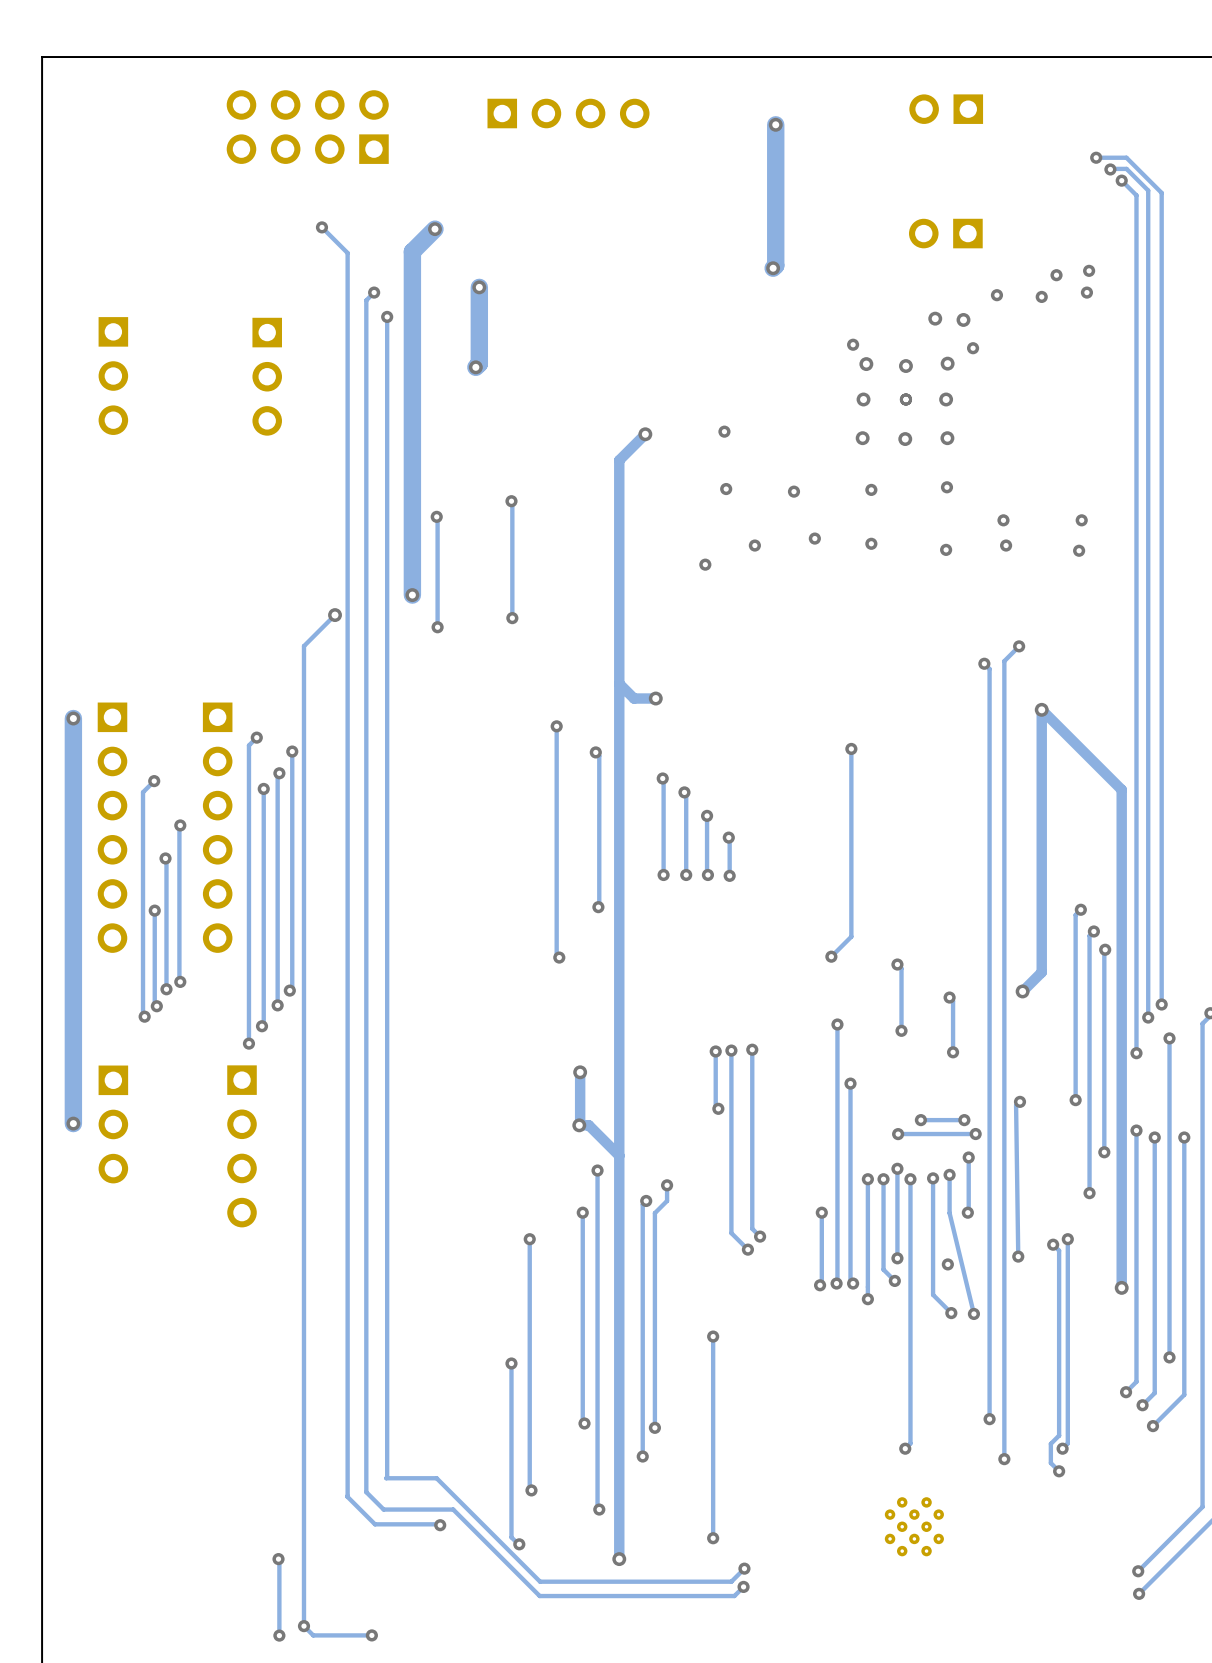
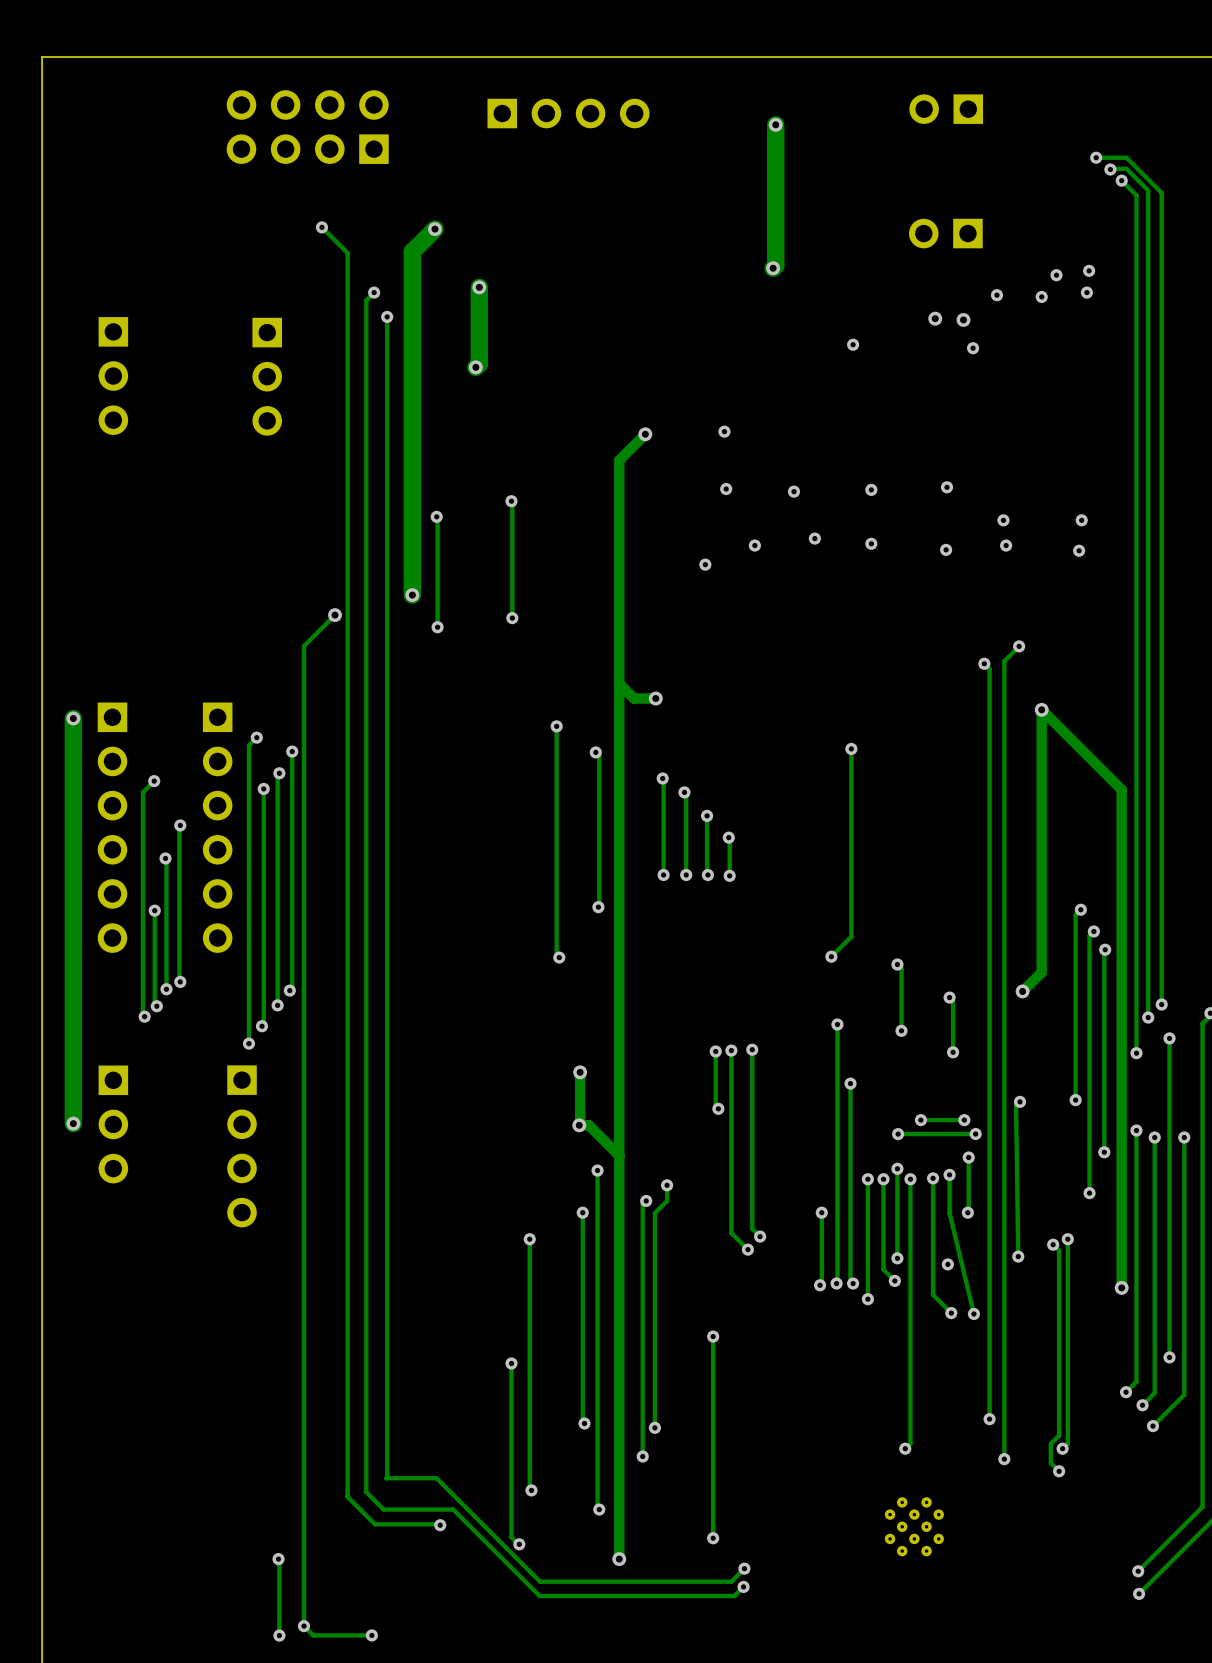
via: (947, 363) -> none
via: (866, 364) -> none
via: (905, 366) -> none
via: (863, 399) -> none
via: (905, 399) -> none
via: (946, 399) -> none
via: (862, 438) -> none
via: (947, 438) -> none
via: (905, 439) -> none

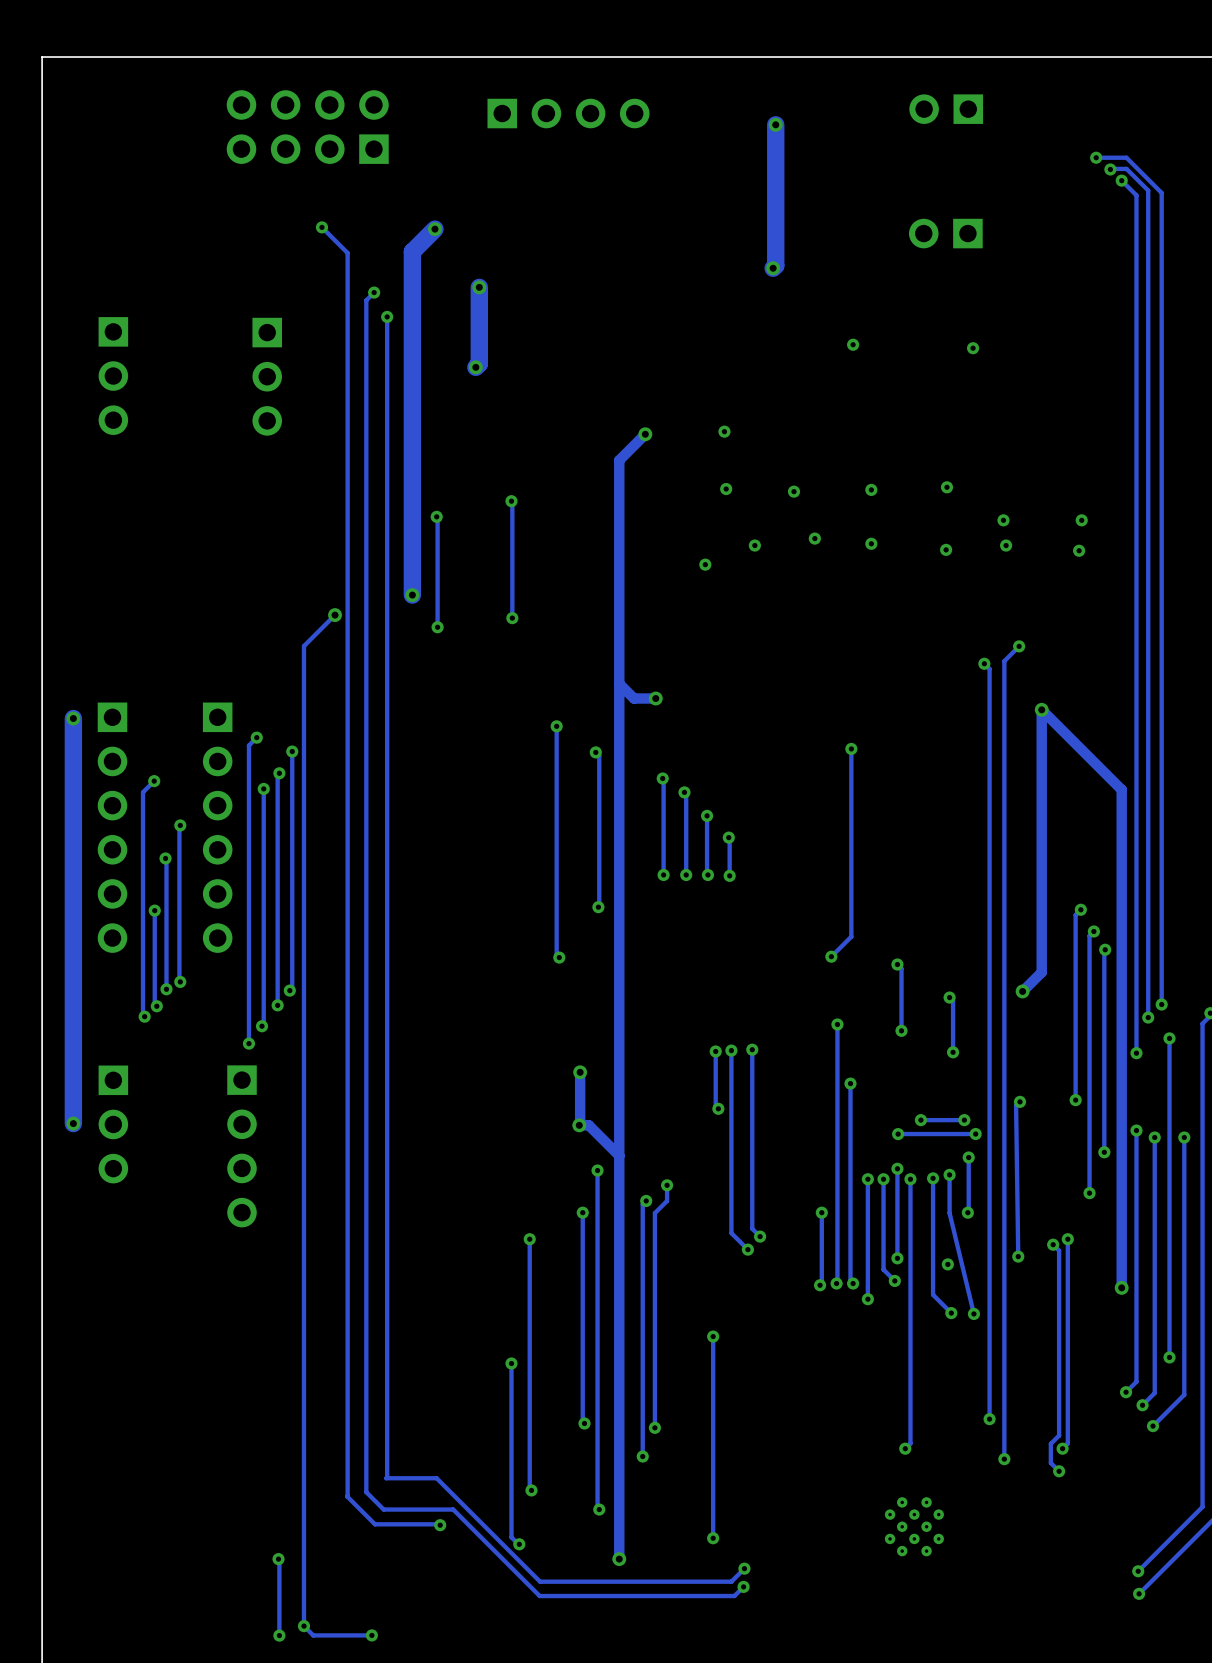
via: (1089, 270) -> none
via: (1056, 275) -> none
via: (1086, 292) -> none
via: (996, 295) -> none
via: (1041, 296) -> none
via: (935, 318) -> none
via: (963, 319) -> none

